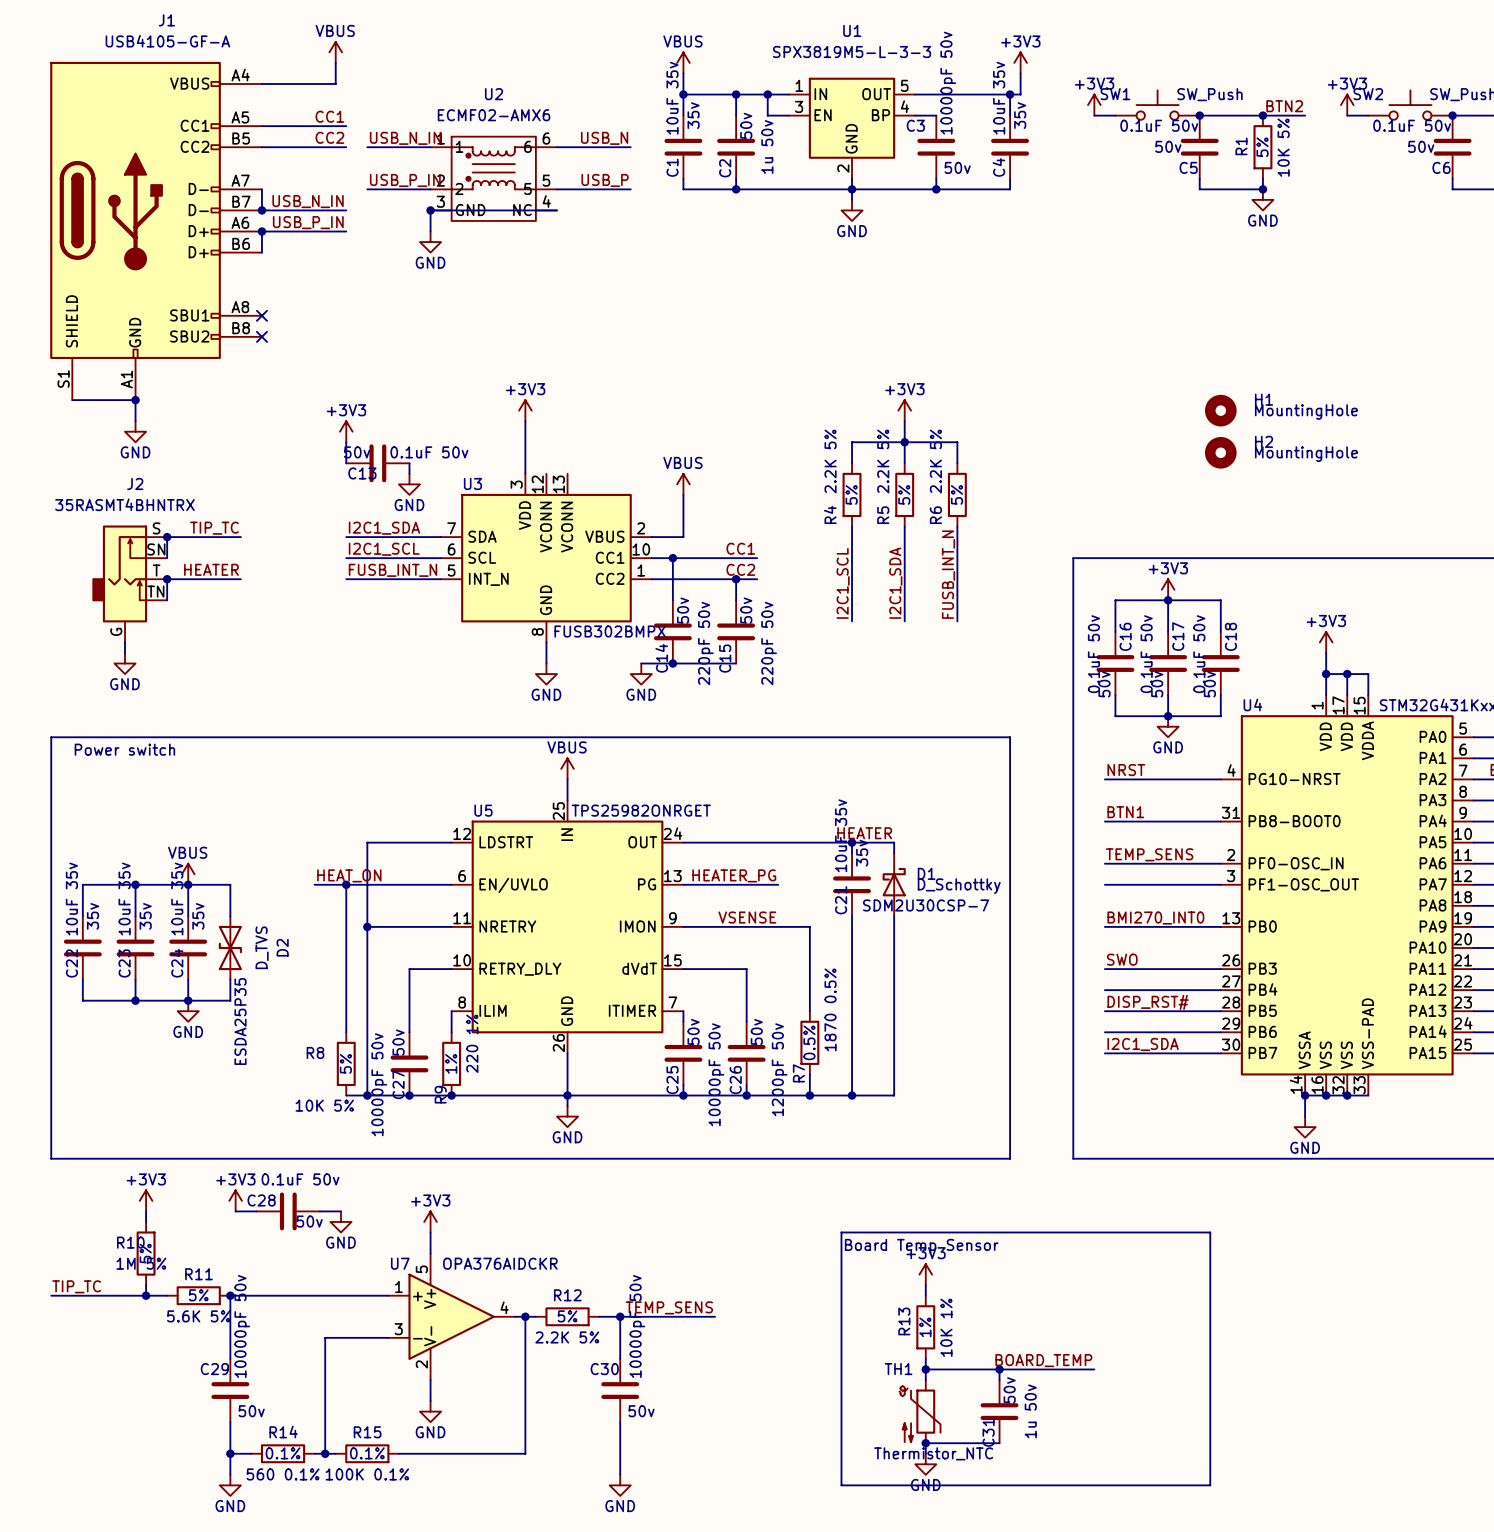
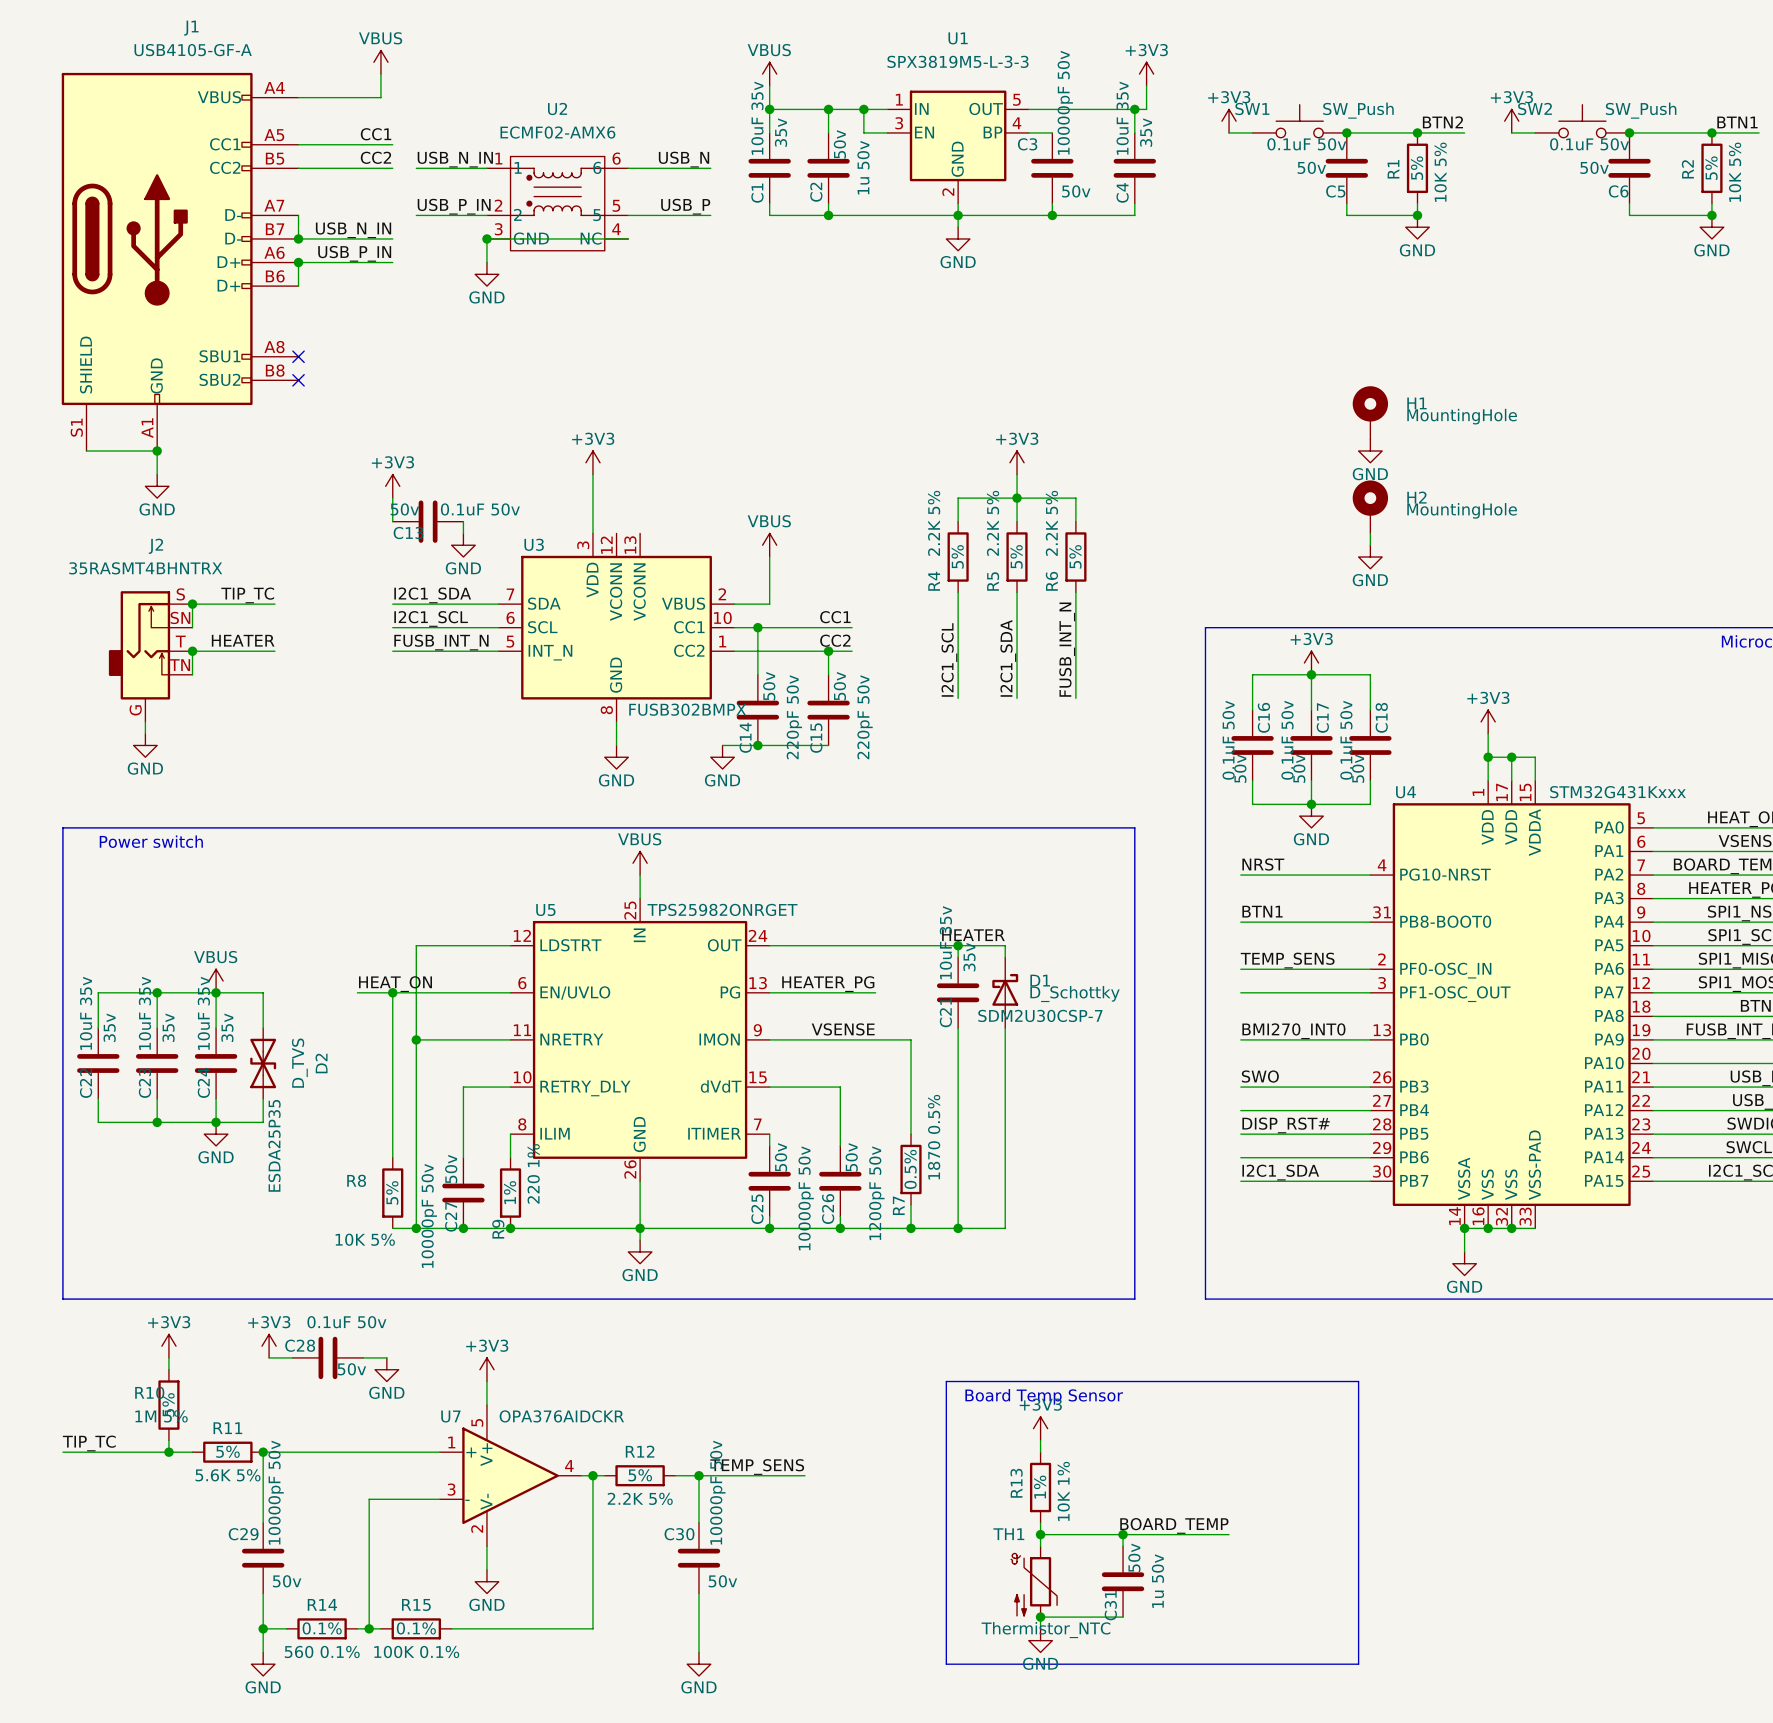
H1 symbol: [1204, 394, 1237, 427] -> [1352, 386, 1389, 440]
power symbol: none -> GND (1370, 450)
H2 symbol: [1204, 436, 1237, 469] -> [1352, 480, 1389, 534]
wire: none -> (1370, 533) (1370, 545)
power symbol: none -> GND (1370, 557)

